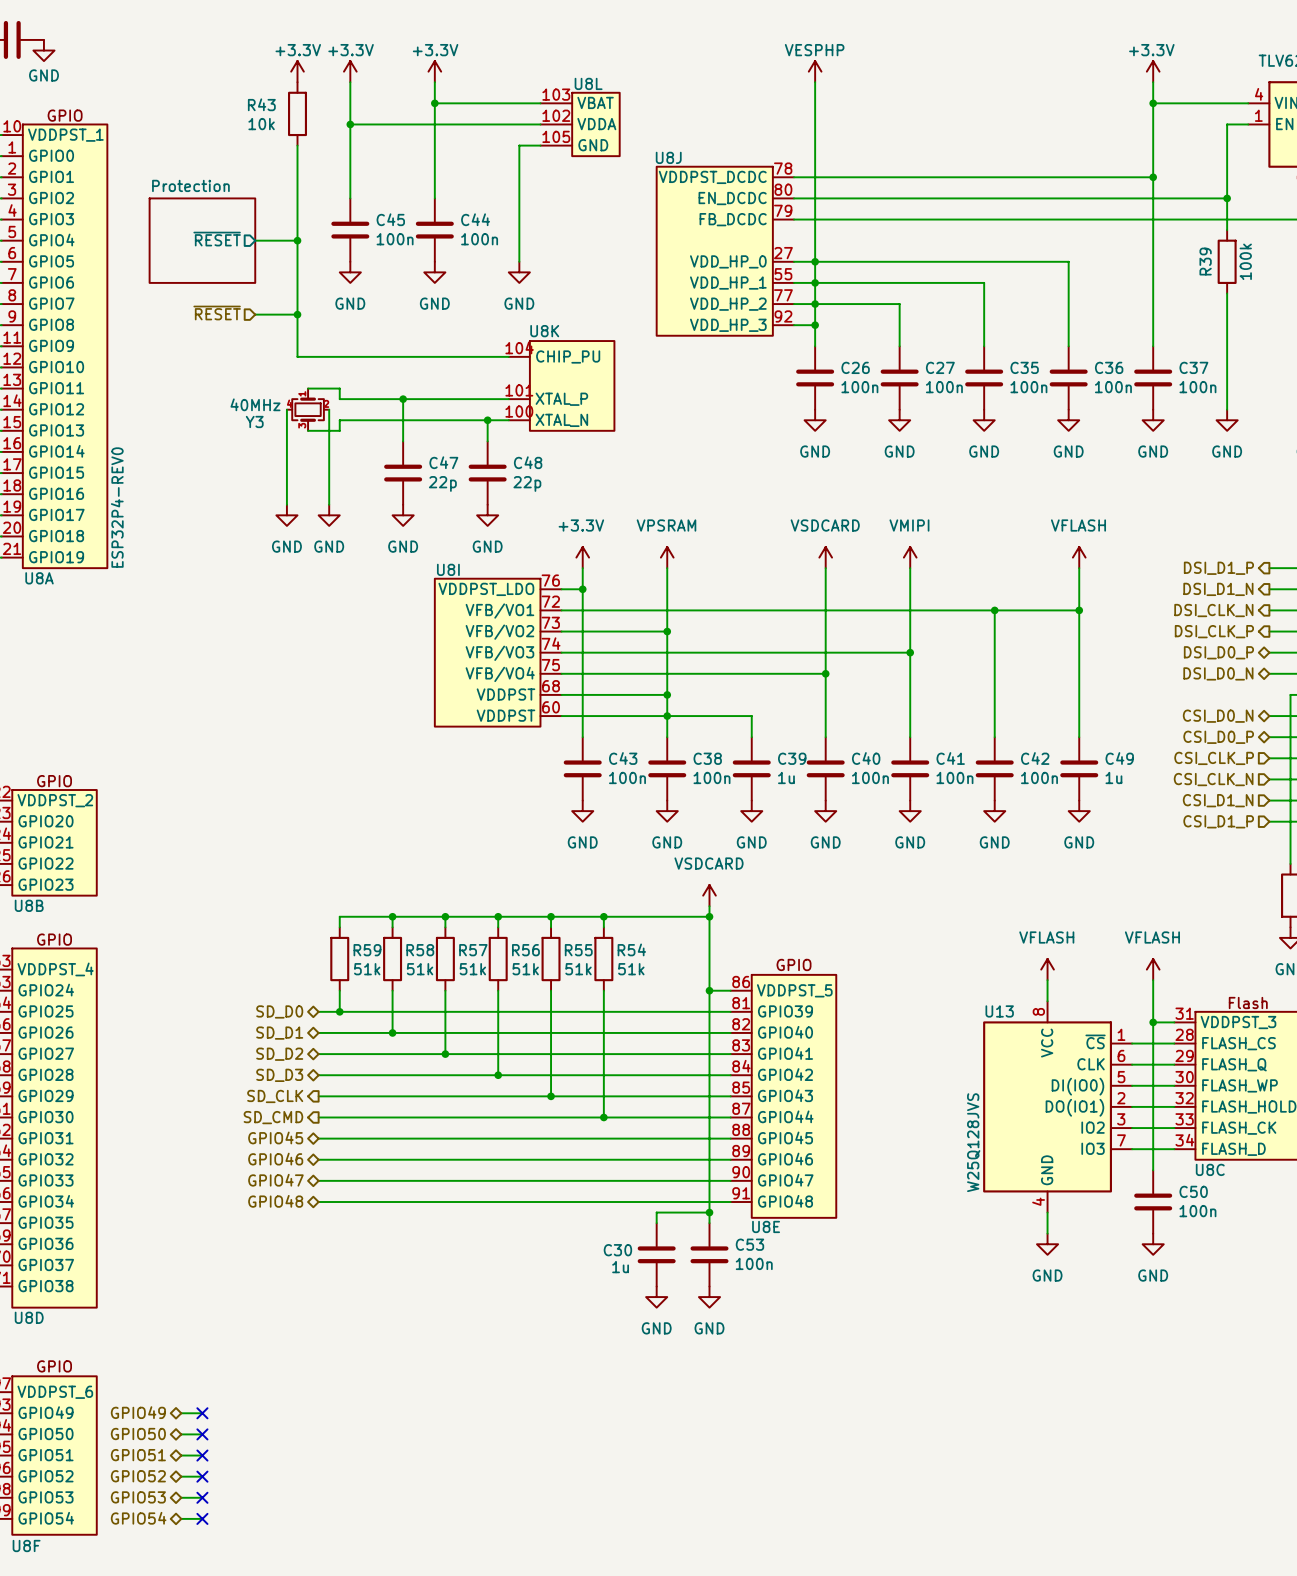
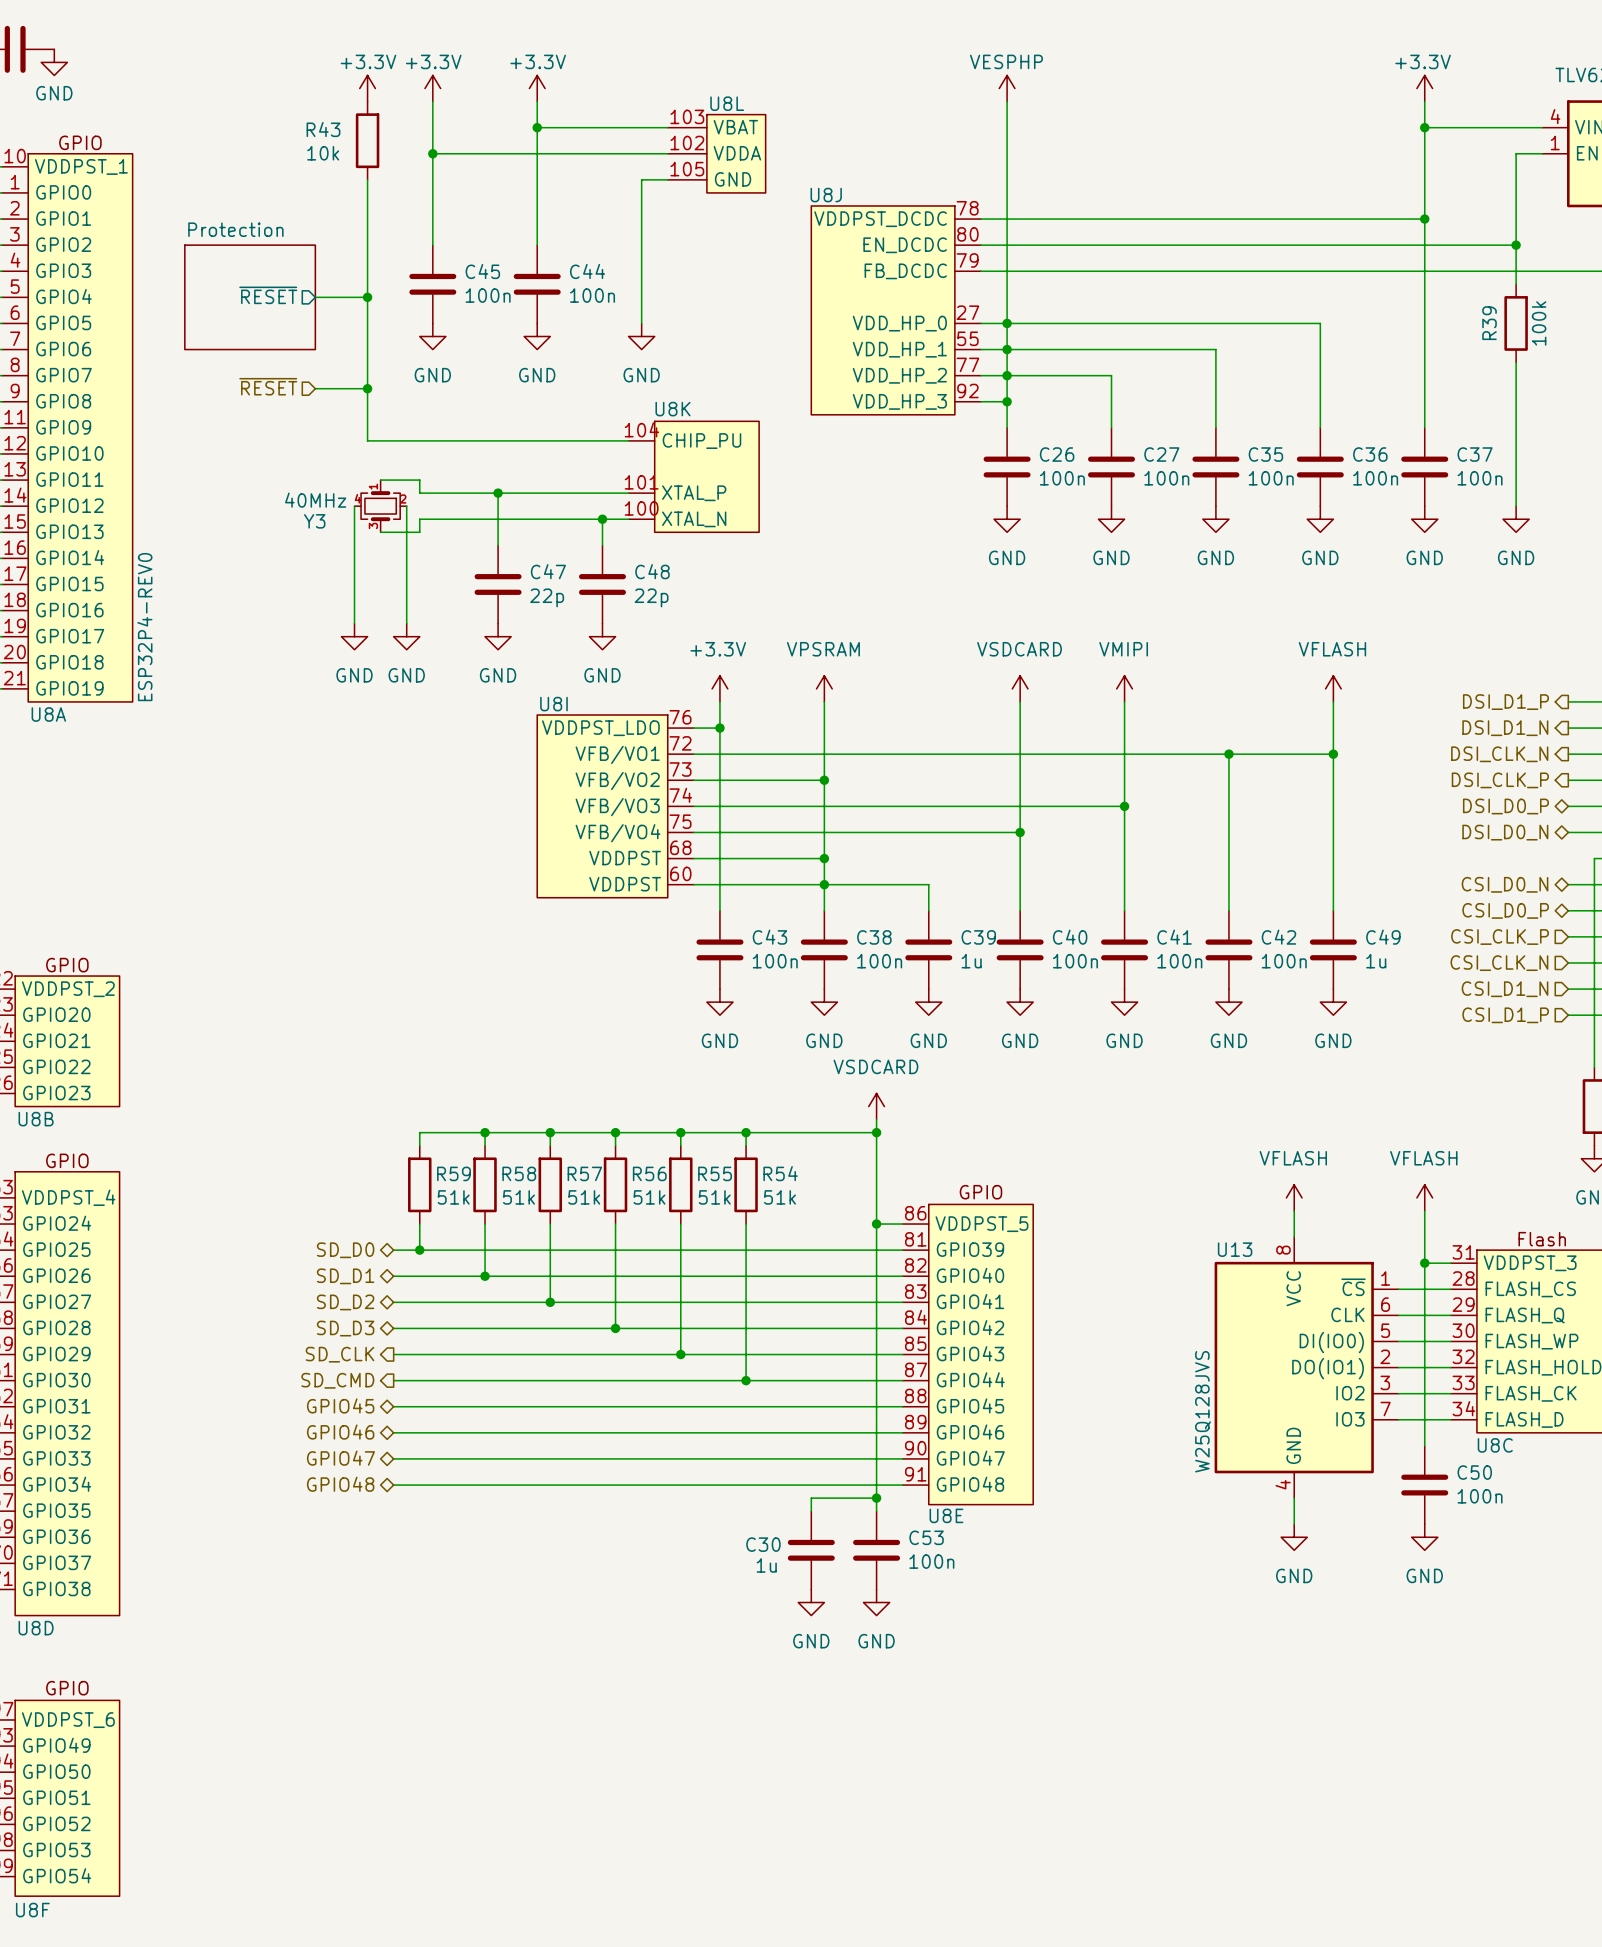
hierarchical label: GPIO49 (138, 1412) -> none
wire: (181, 1413) (202, 1413) -> none
no-connect mark: (202, 1413) -> none
hierarchical label: GPIO50 (138, 1434) -> none
wire: (181, 1434) (202, 1434) -> none
no-connect mark: (202, 1434) -> none
hierarchical label: GPIO51 (138, 1455) -> none
wire: (181, 1455) (202, 1455) -> none
no-connect mark: (202, 1455) -> none
hierarchical label: GPIO52 (138, 1476) -> none
wire: (181, 1476) (202, 1476) -> none
no-connect mark: (202, 1476) -> none
hierarchical label: GPIO53 (138, 1497) -> none
wire: (181, 1497) (202, 1497) -> none
no-connect mark: (202, 1497) -> none
hierarchical label: GPIO54 (138, 1518) -> none
wire: (181, 1518) (202, 1518) -> none
no-connect mark: (202, 1518) -> none

